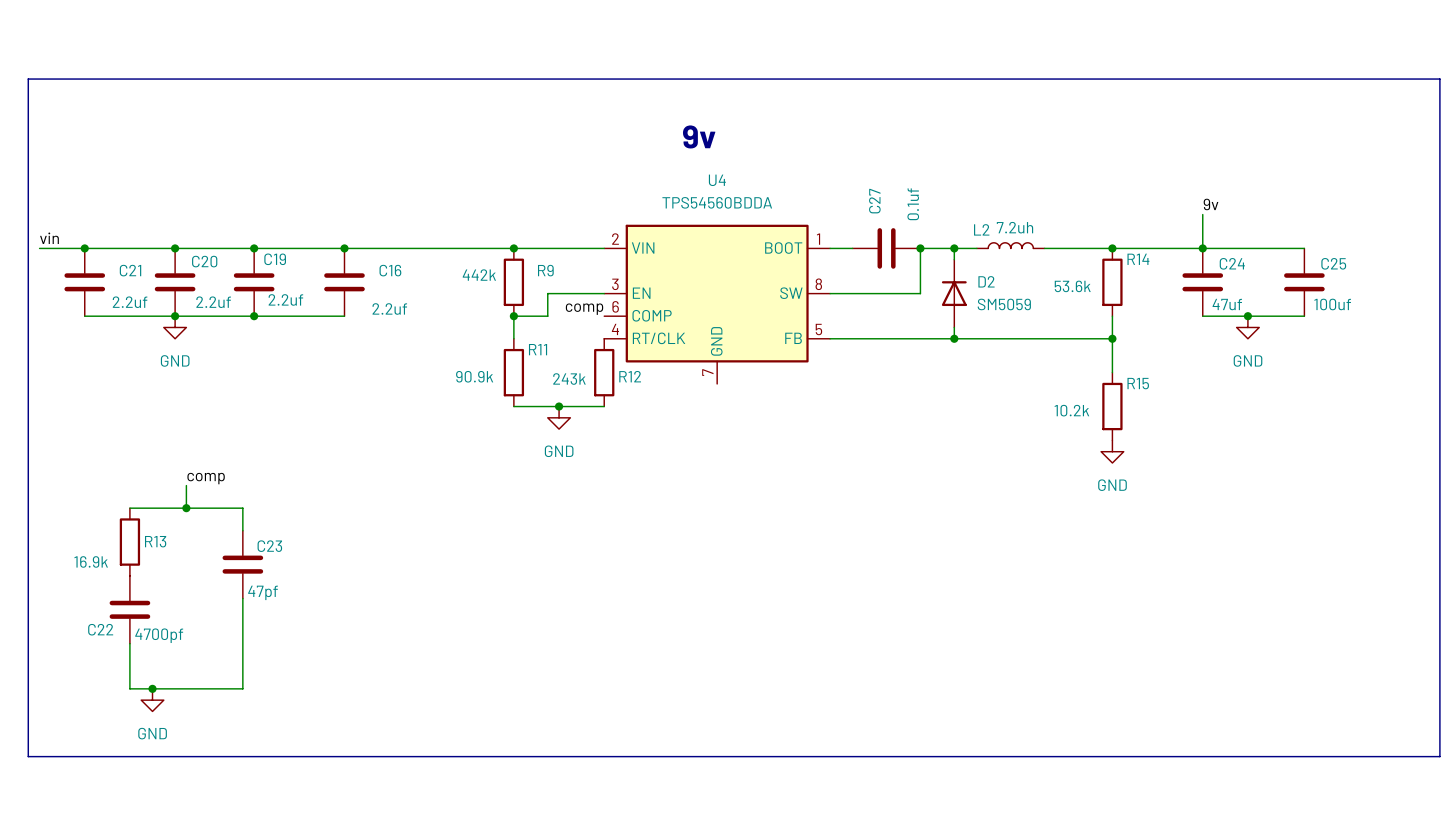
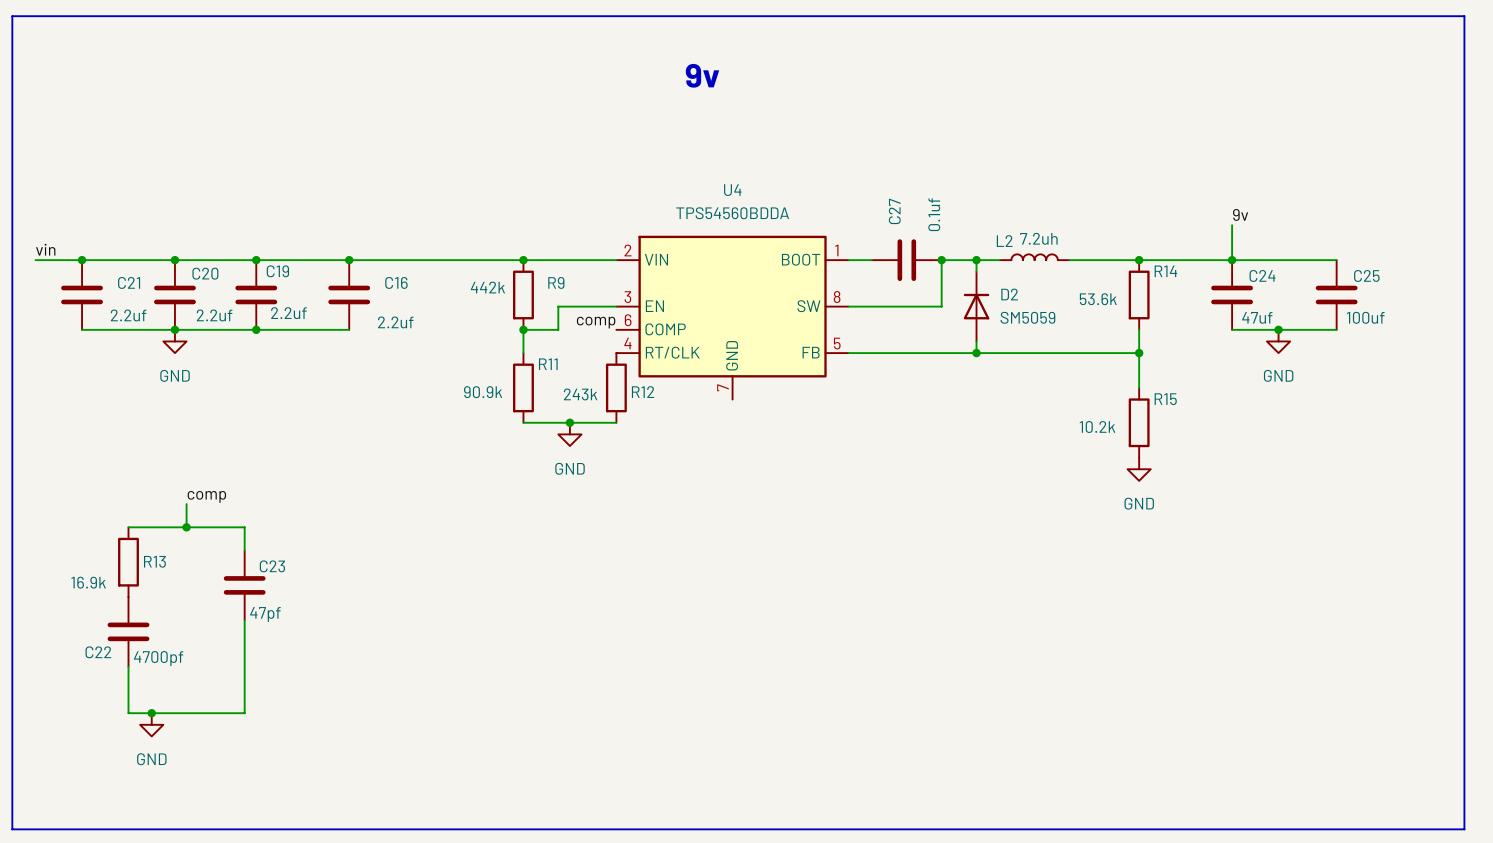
line: (28, 79) (1439, 79) (1439, 756) (28, 756) (28, 79) -> (12, 16) (12, 829) (1464, 829) (1464, 16) (12, 16)
text position: 9v (699, 136) -> 9v (702, 75)

